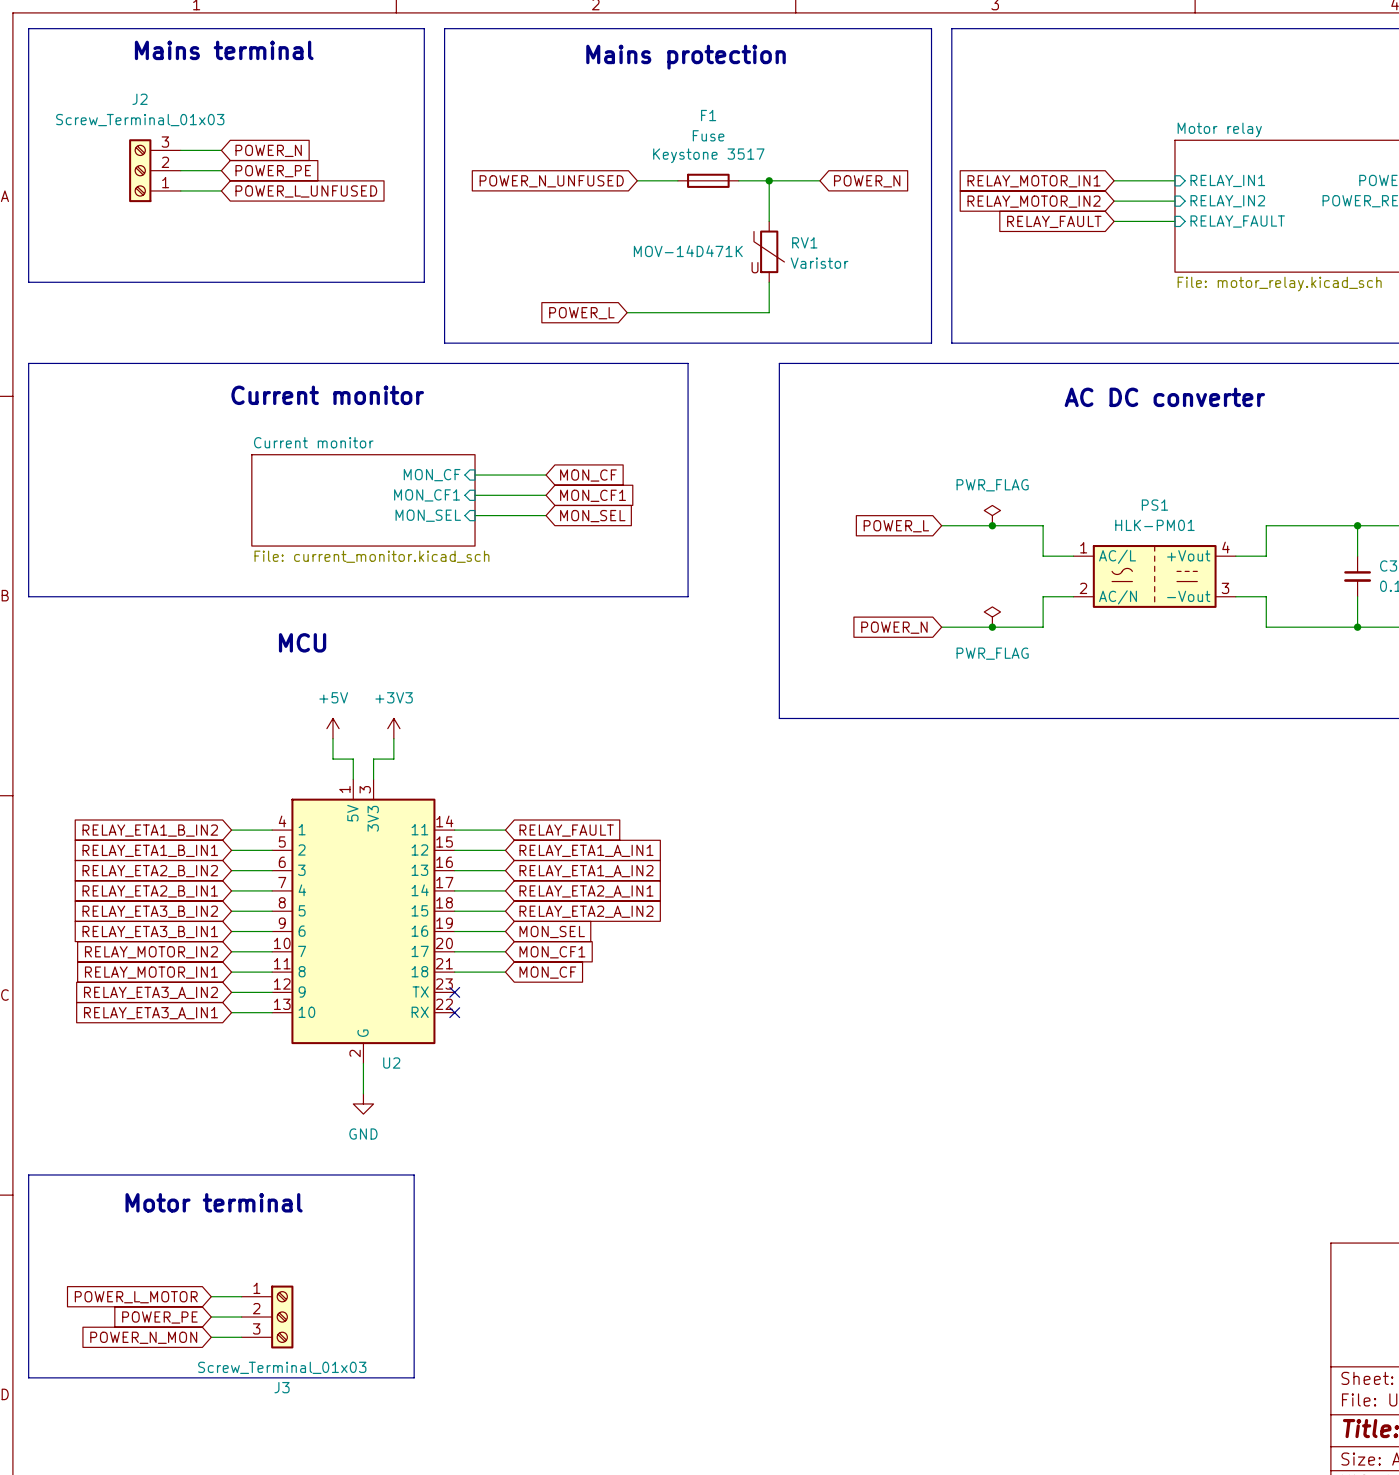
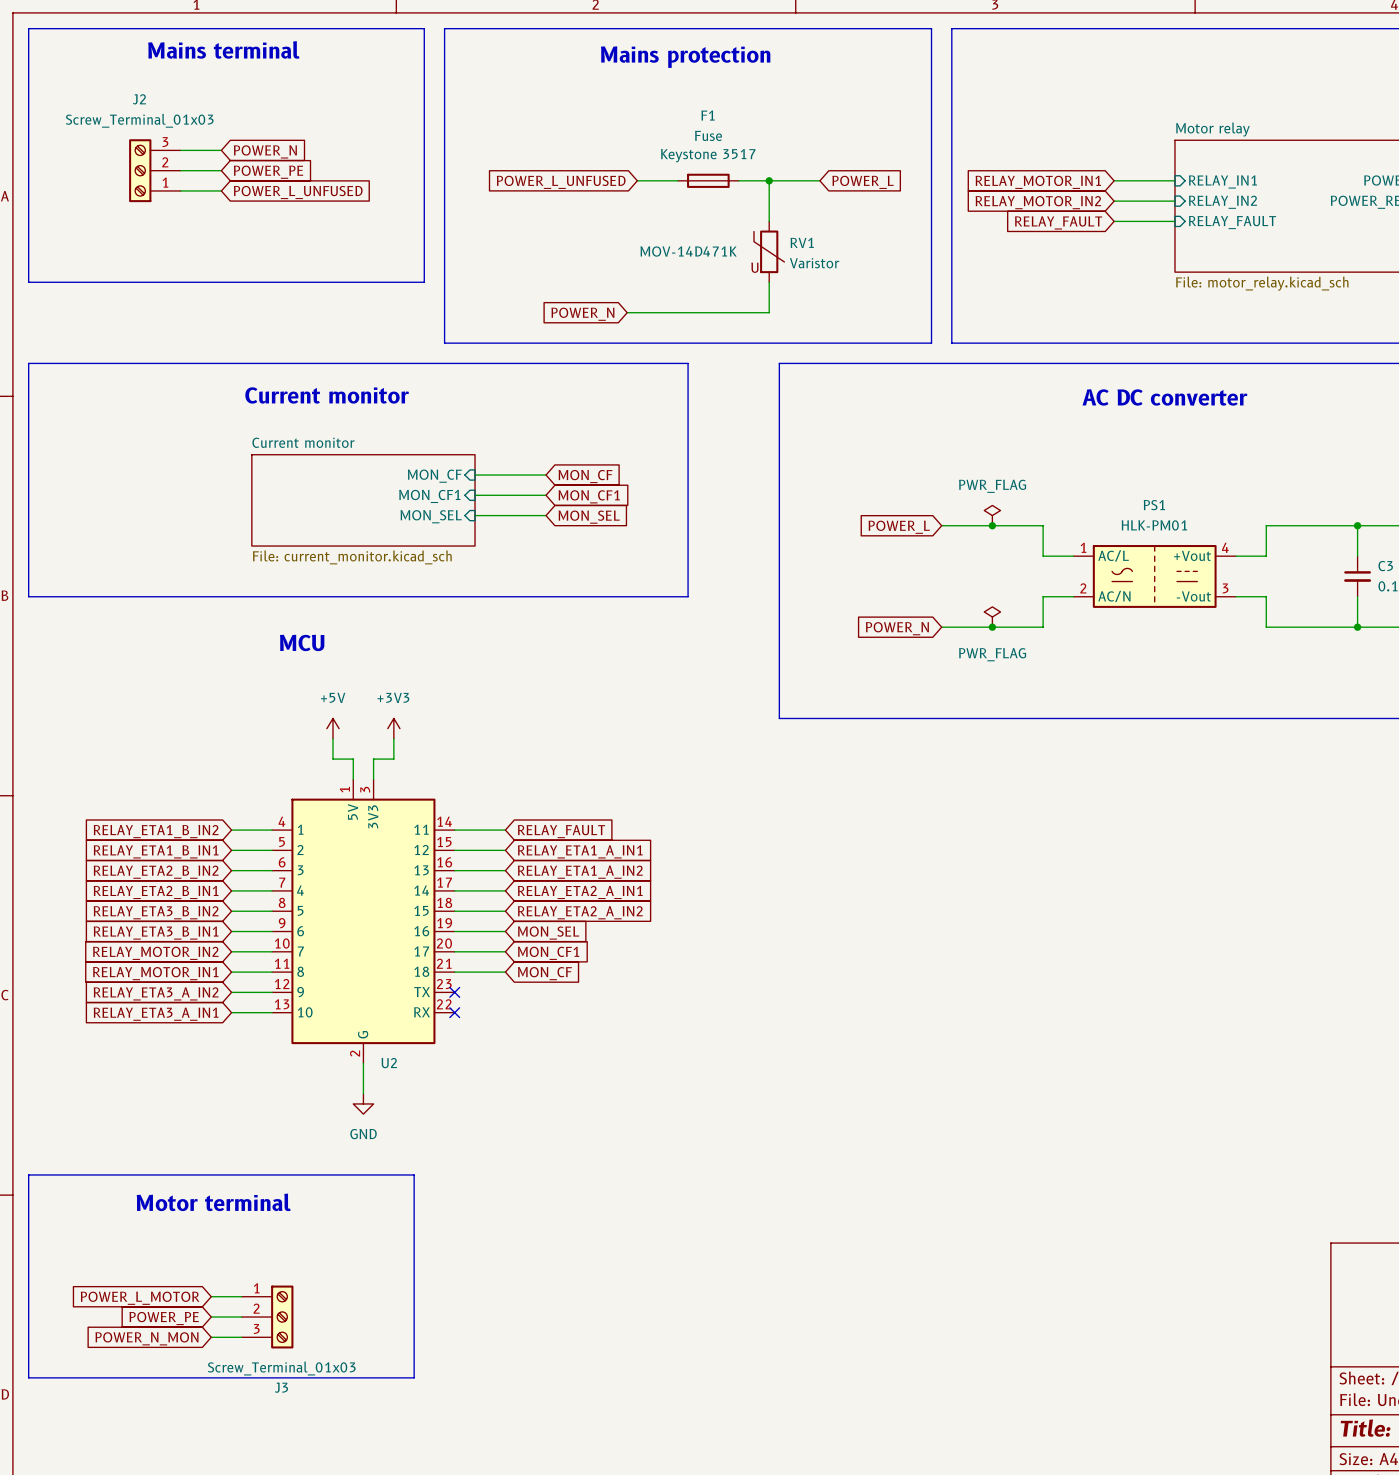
global label: POWER_N_UNFUSED (551, 181) -> POWER_L_UNFUSED (561, 182)
global label: POWER_N (867, 181) -> POWER_L (863, 182)
global label: POWER_L (581, 313) -> POWER_N (582, 314)

